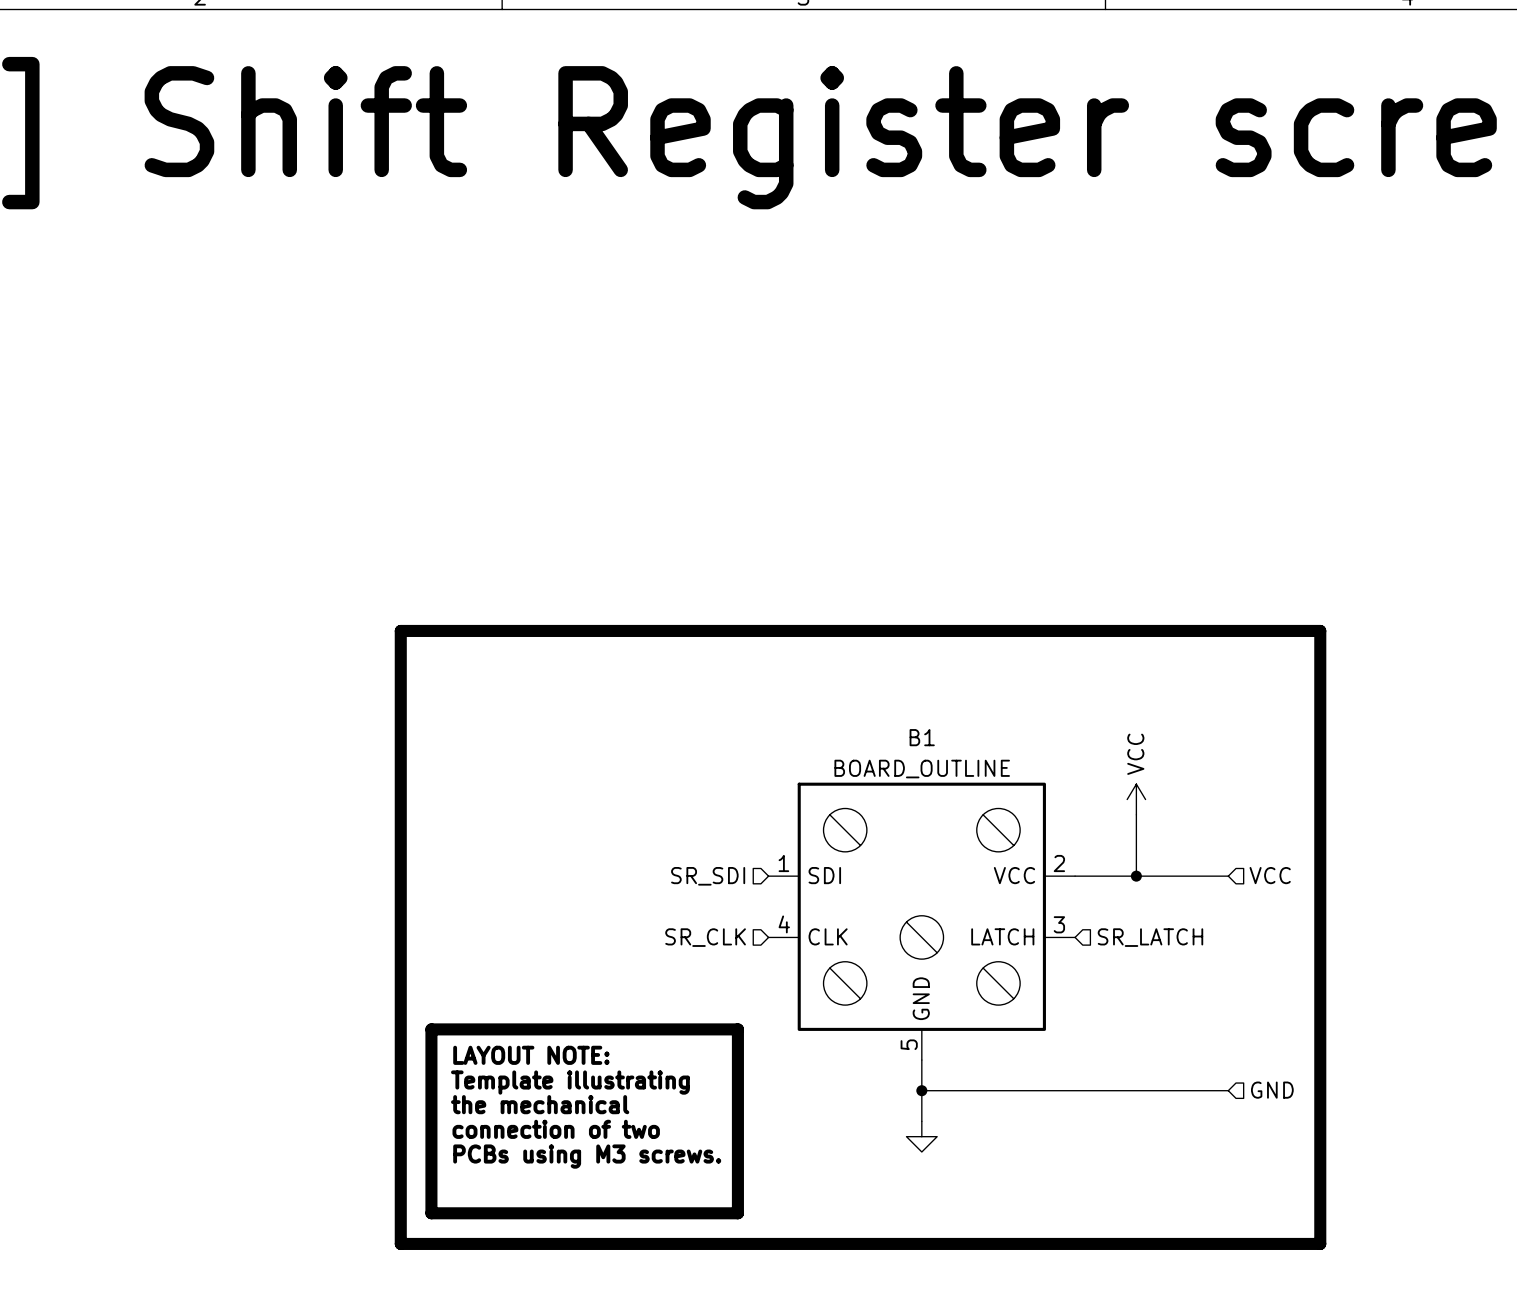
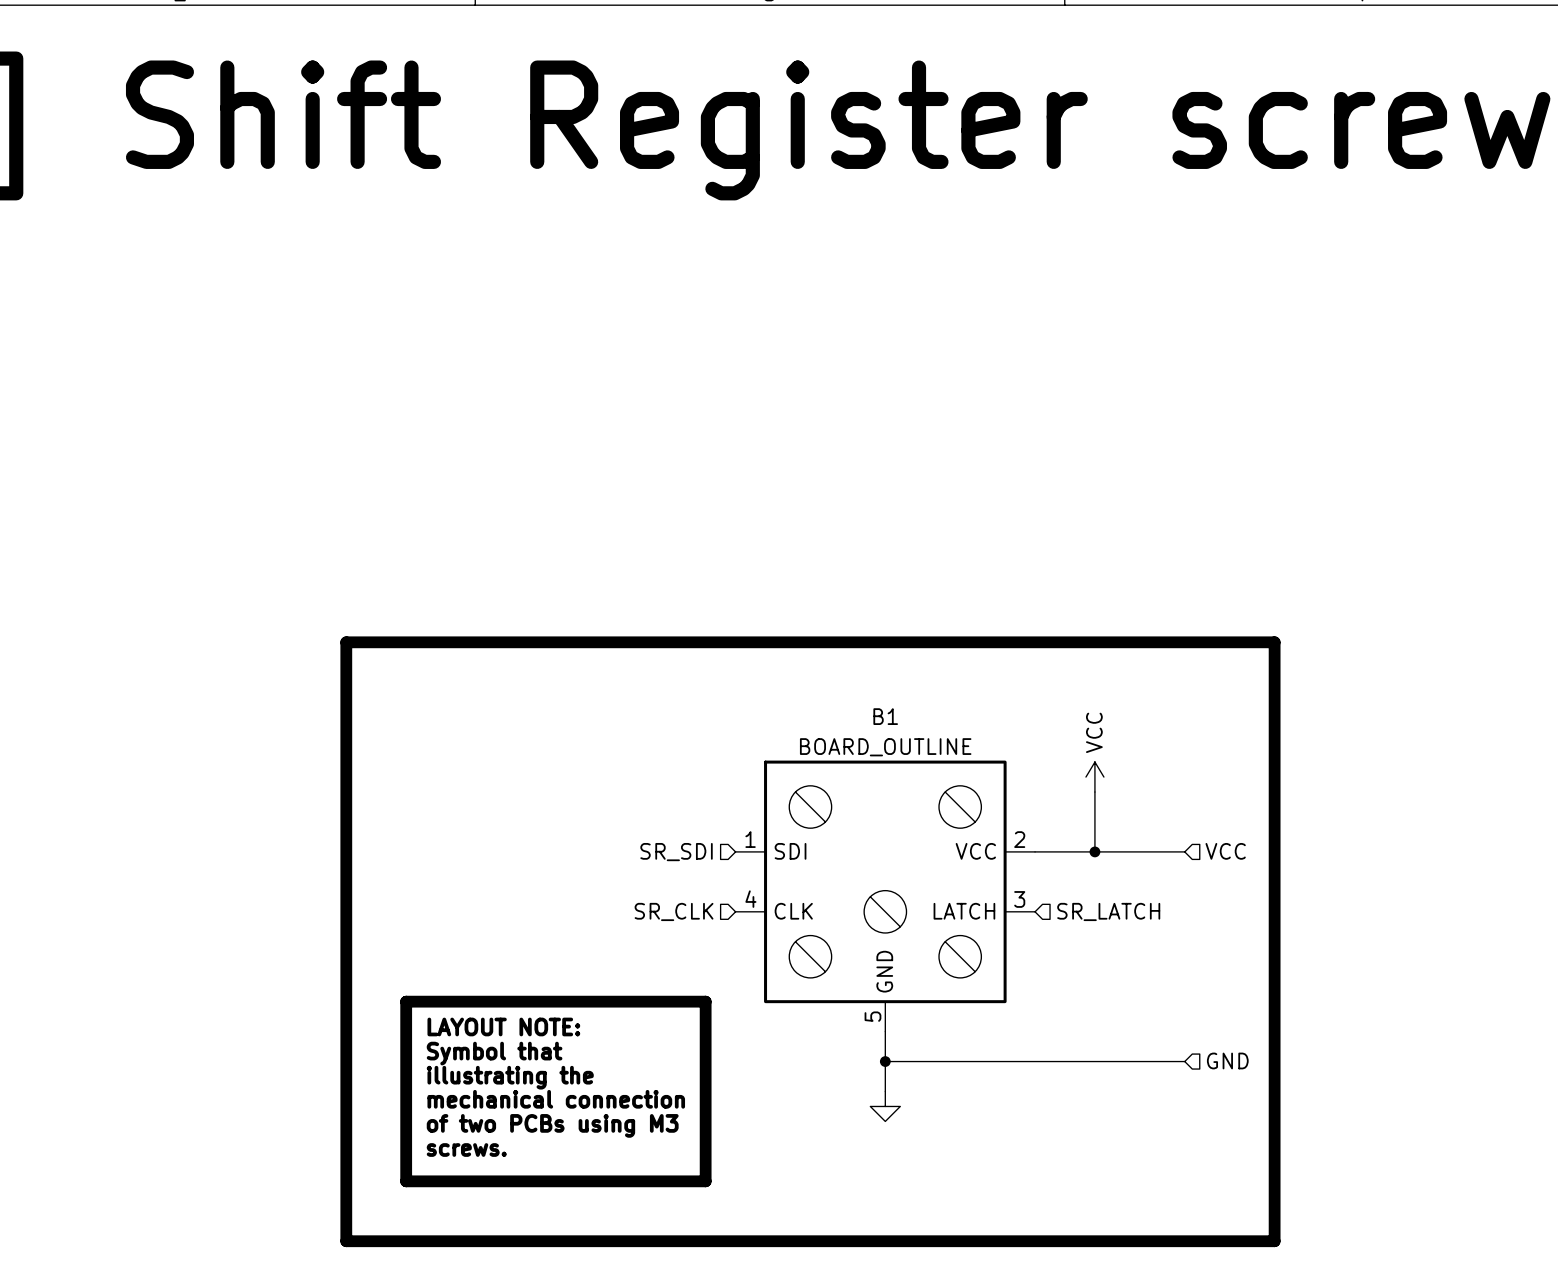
line: (1320, 661) (1320, 630) (400, 630) (400, 1243) (1320, 1243) -> (1274, 642) (346, 642) (346, 1241) (1274, 1241) (1274, 1211)
text: Template illustrating (570, 1082) -> Symbol that (494, 1053)
text: the mechanical (540, 1104) -> illustrating the (510, 1077)
text: connection of two (556, 1129) -> mechanical connection (556, 1099)
text: PCBs using M3 screws. (587, 1156) -> of two PCBs using M3 (552, 1125)
text: none -> screws. (466, 1150)

